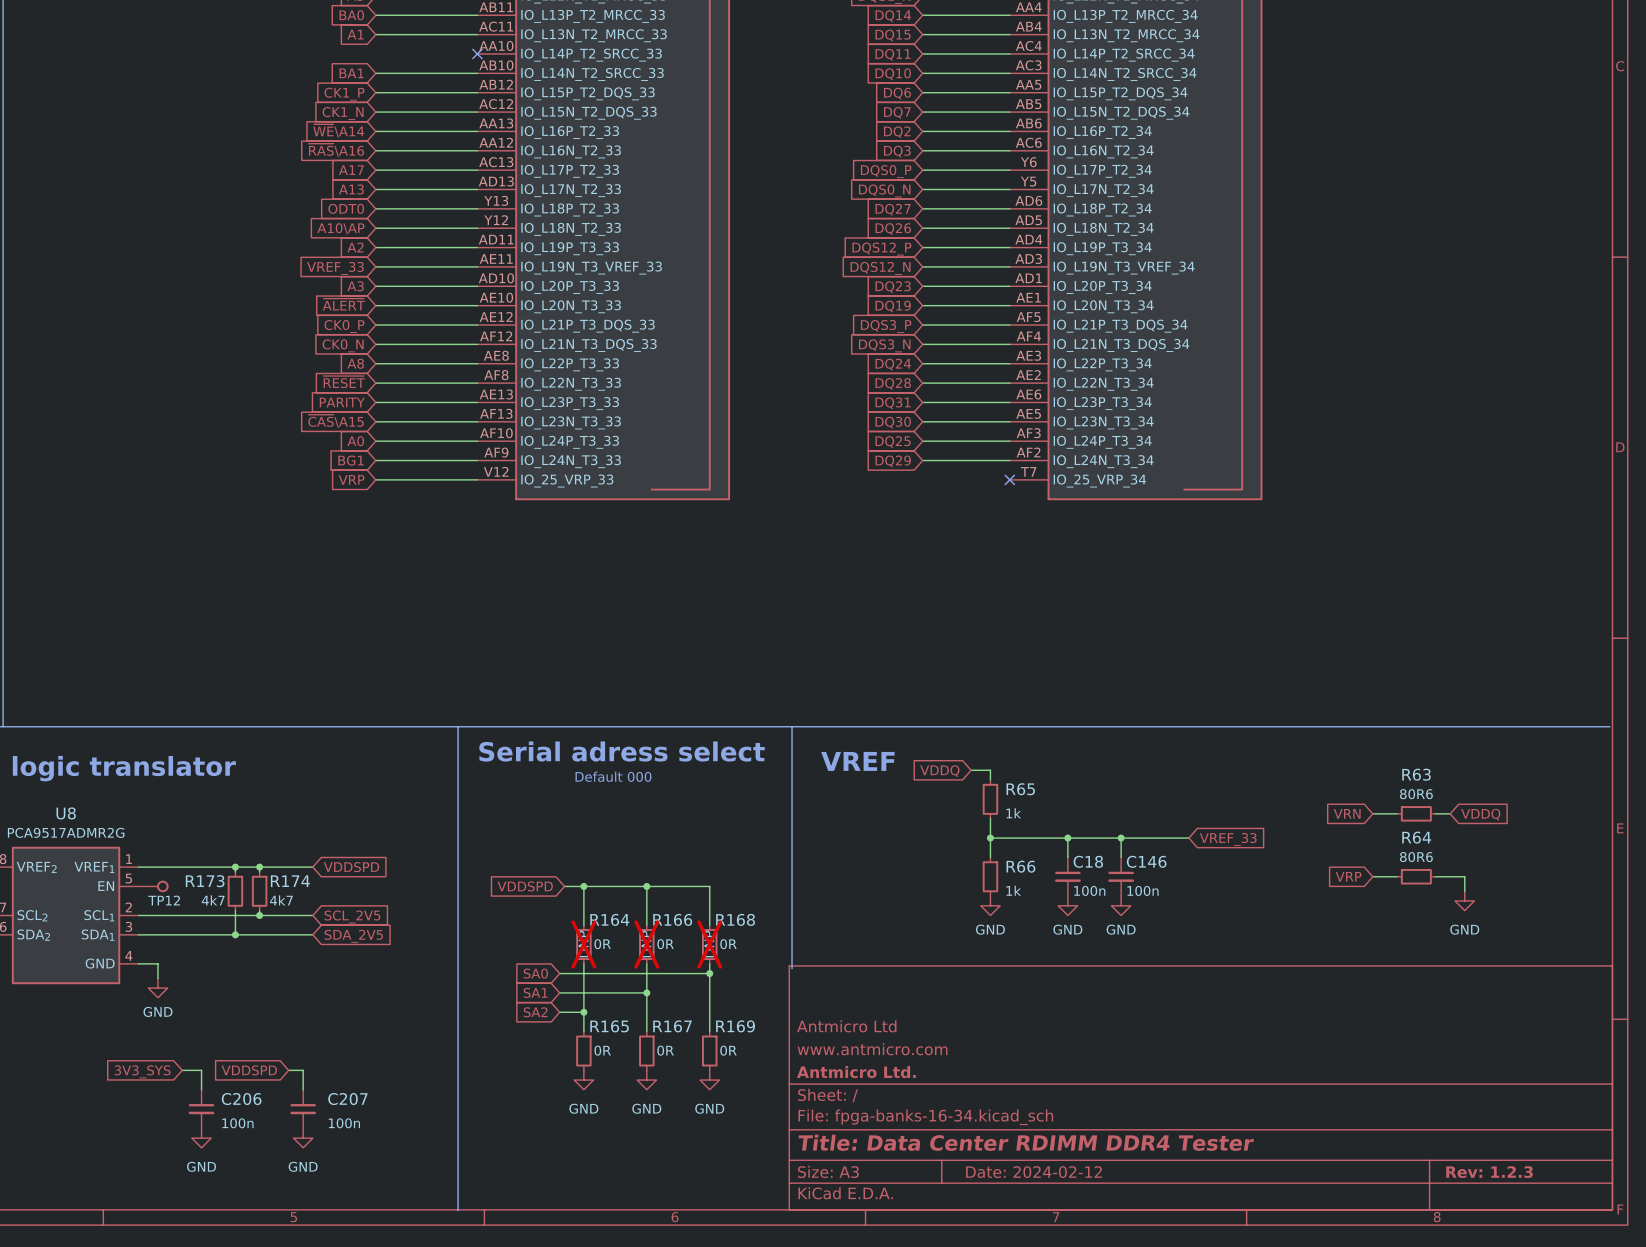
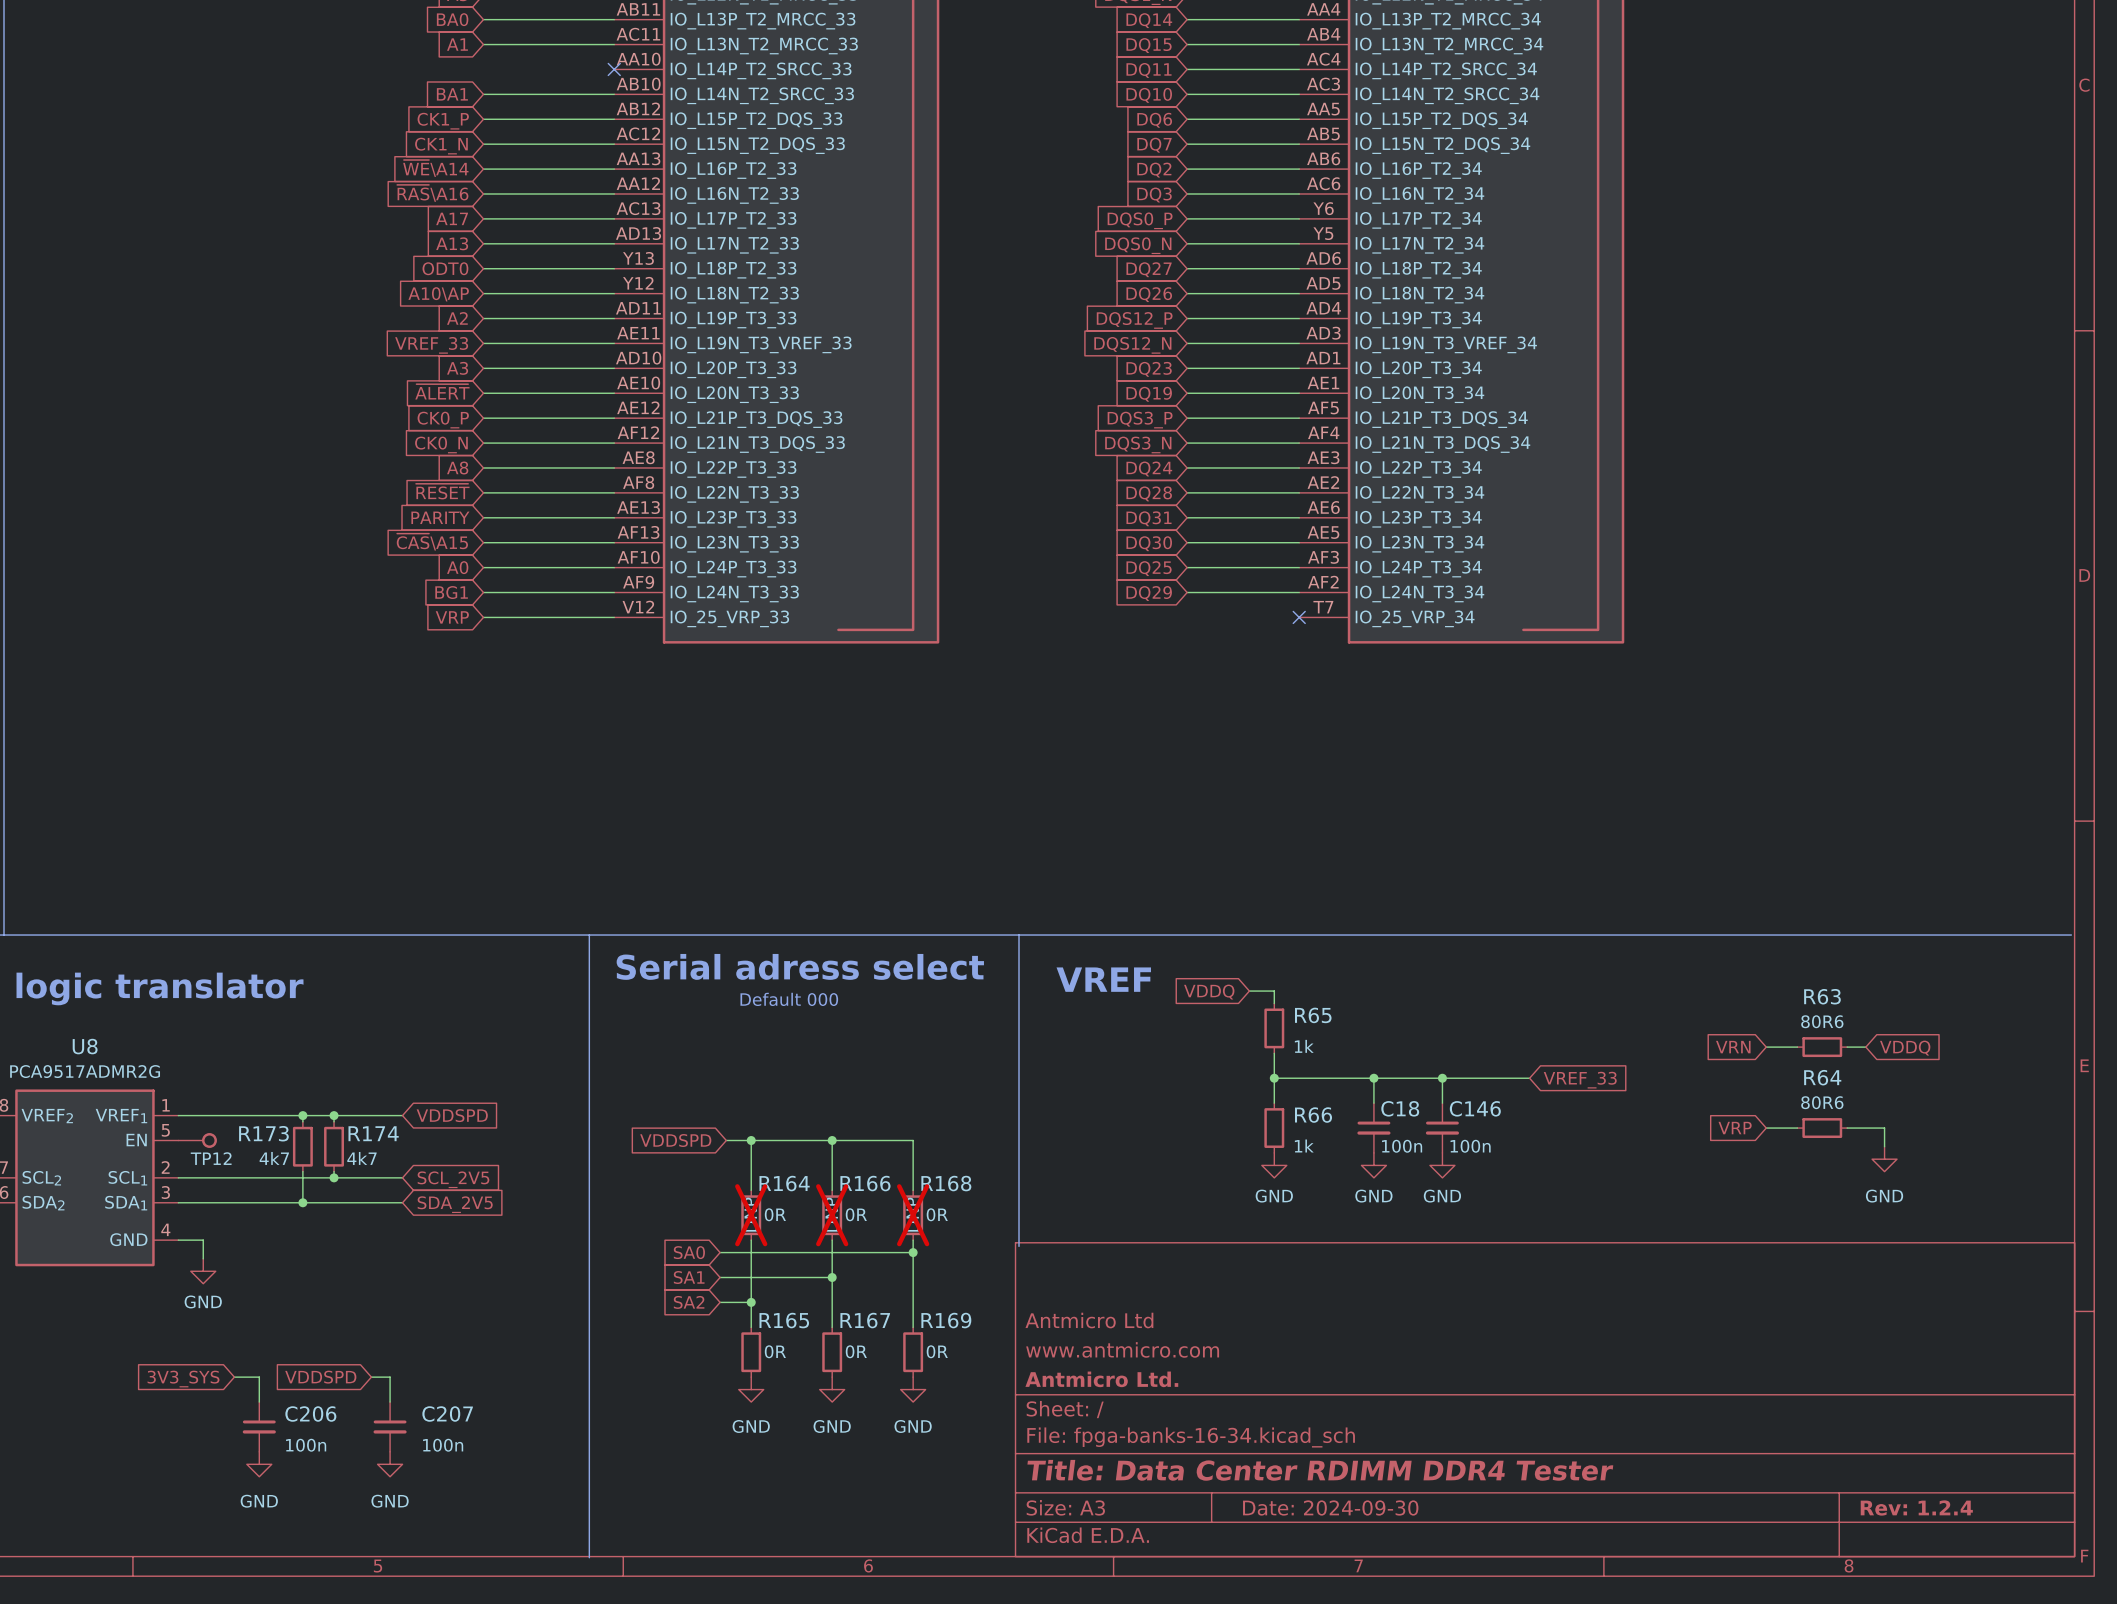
title block: Date: 2024-02-12 (1034, 1172) -> Date: 2024-09-30 (1330, 1507)
title block: Rev: 1.2.3 (1489, 1172) -> Rev: 1.2.4 (1916, 1507)

